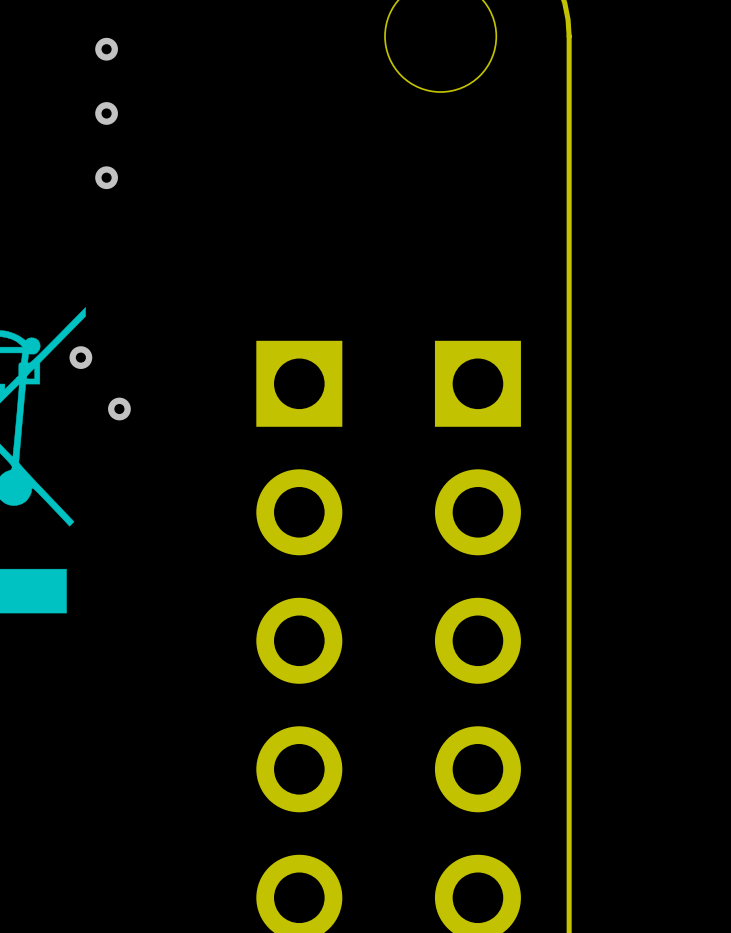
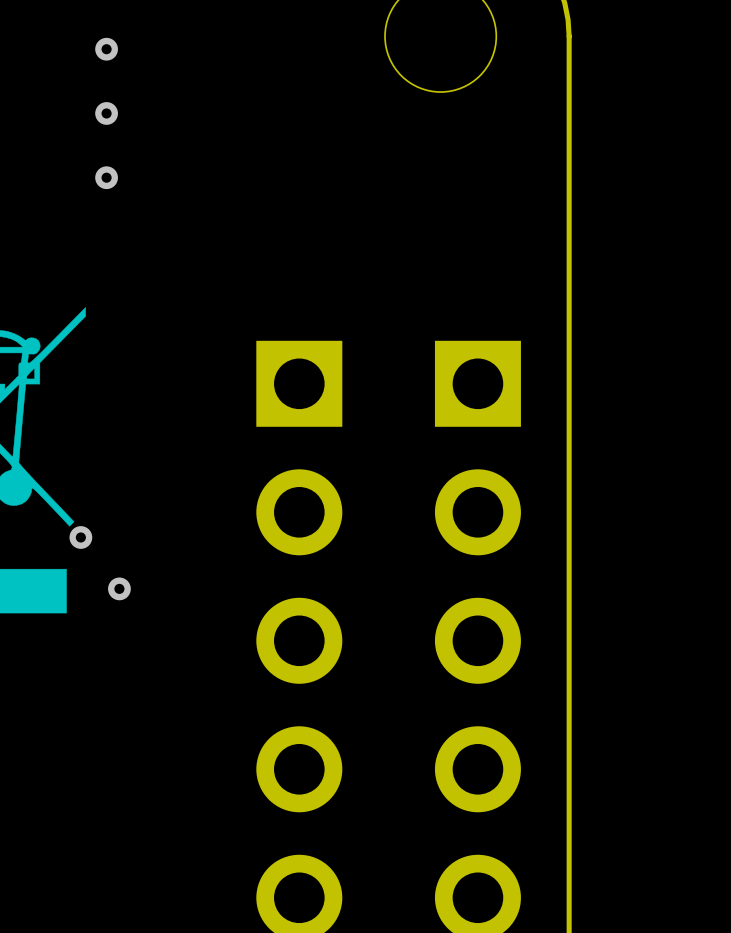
via: (80, 357) -> none
via: (119, 409) -> none
via: none -> (80, 537)
via: none -> (119, 588)

